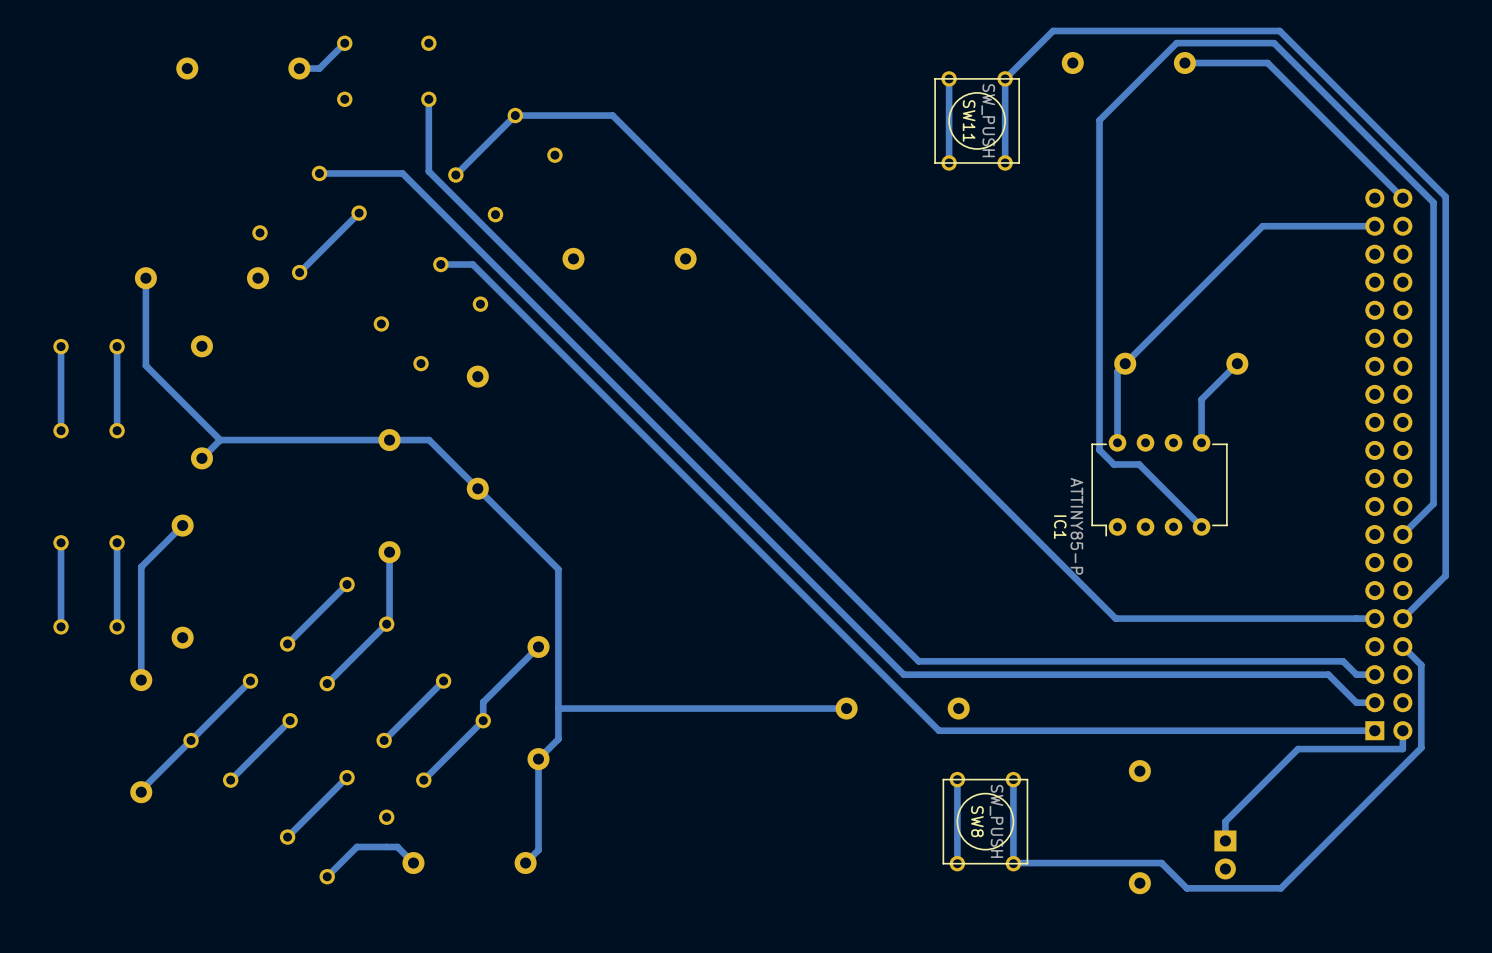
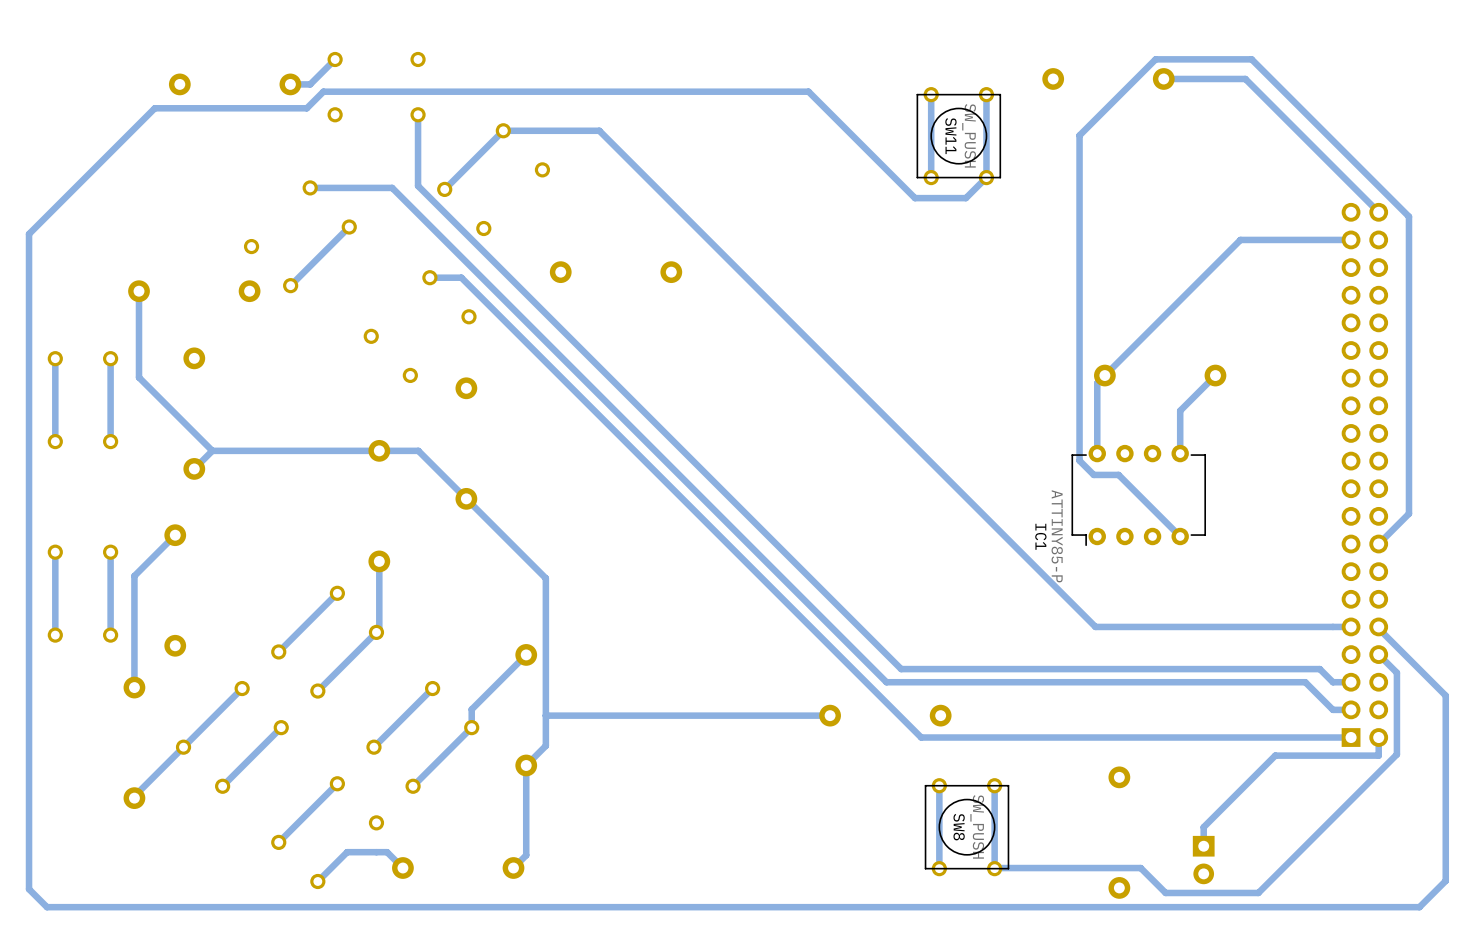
track: (1005, 78) (1053, 30) (1279, 30) (1445, 196) (1445, 575) (1402, 618) -> (986, 177) (965, 198) (915, 198) (808, 91) (323, 91) (306, 108) (154, 108) (29, 234) (29, 889) (47, 907) (1419, 907) (1445, 880) (1445, 695) (1378, 626)

